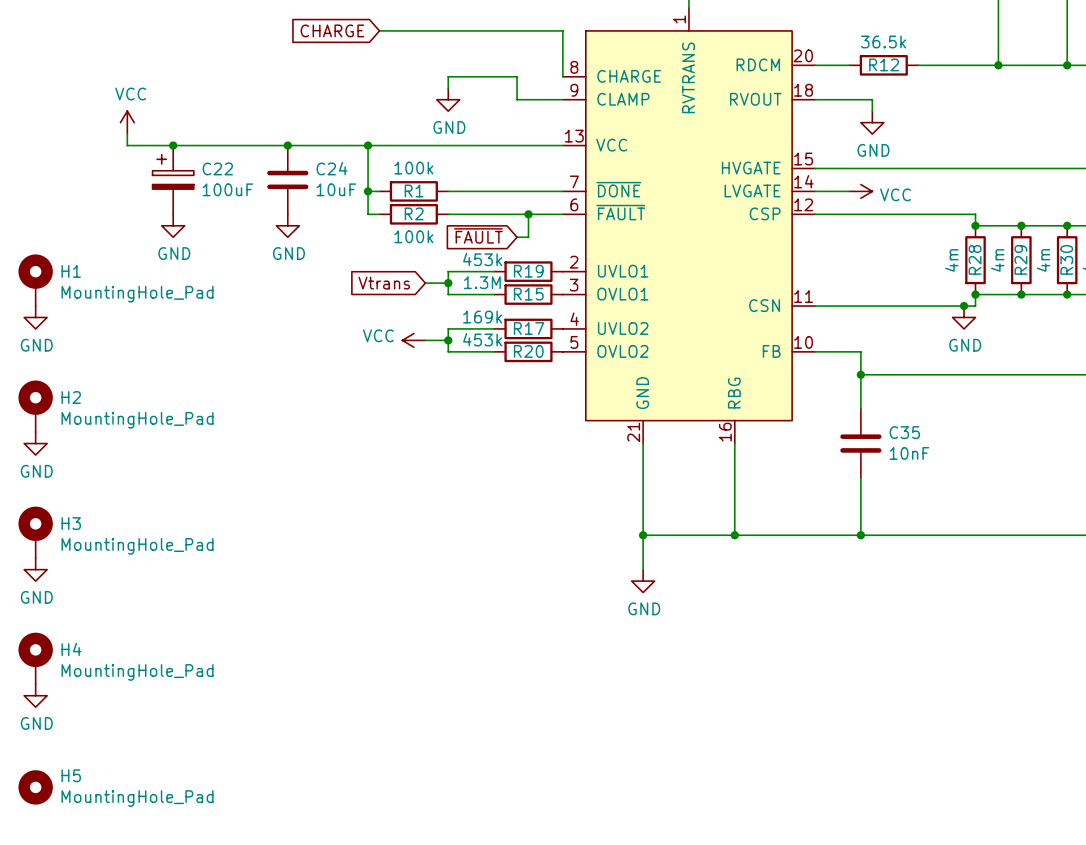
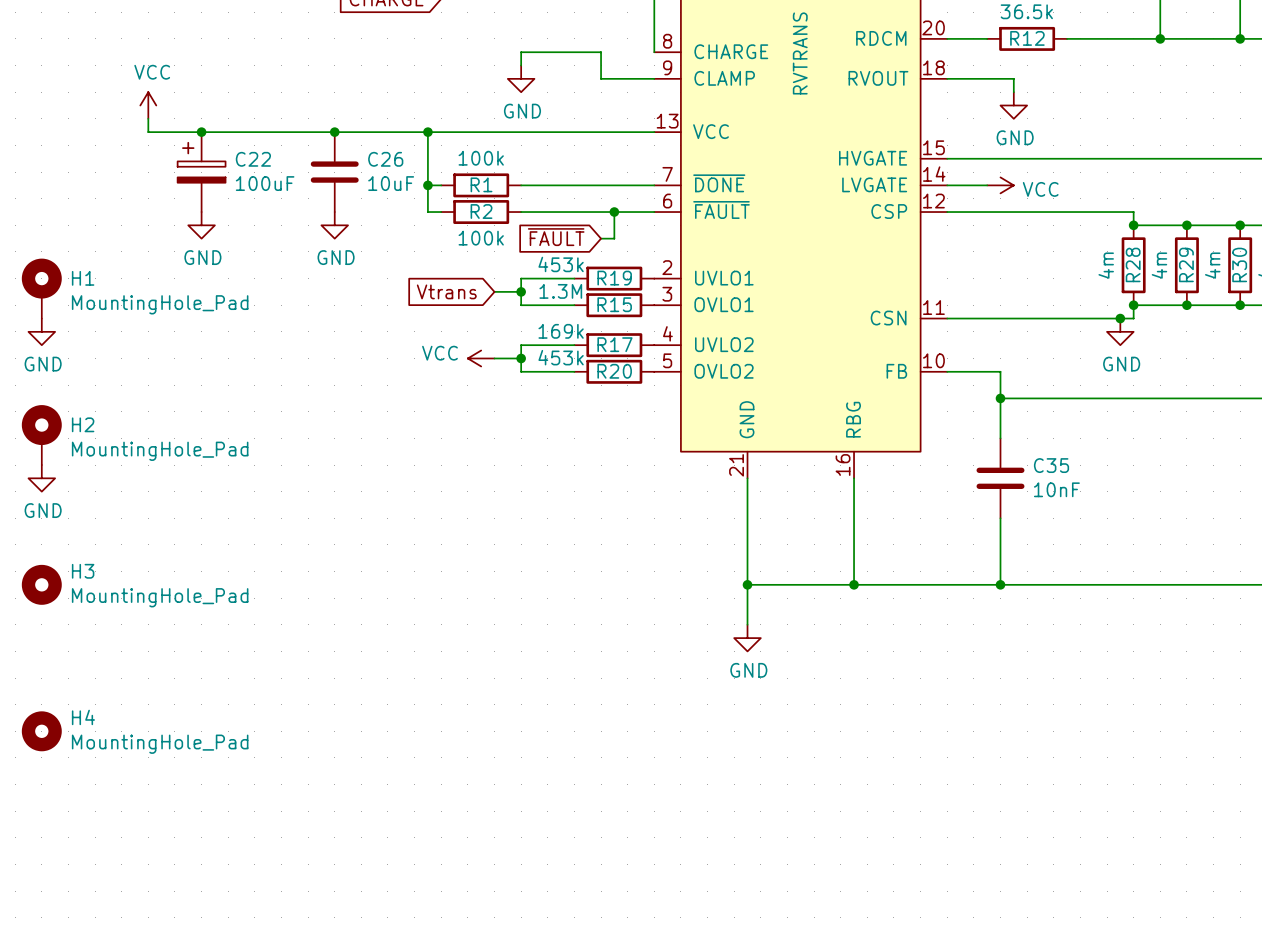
C24 name: C24 (331, 168) -> C26 (385, 159)
H3 symbol: [18, 506, 53, 559] -> [21, 564, 62, 605]
power symbol: GND (35, 569) -> none
H4 symbol: [18, 632, 53, 685] -> [21, 711, 62, 752]
power symbol: GND (35, 695) -> none
H5: MountingHole_Pad (35, 787) -> none

